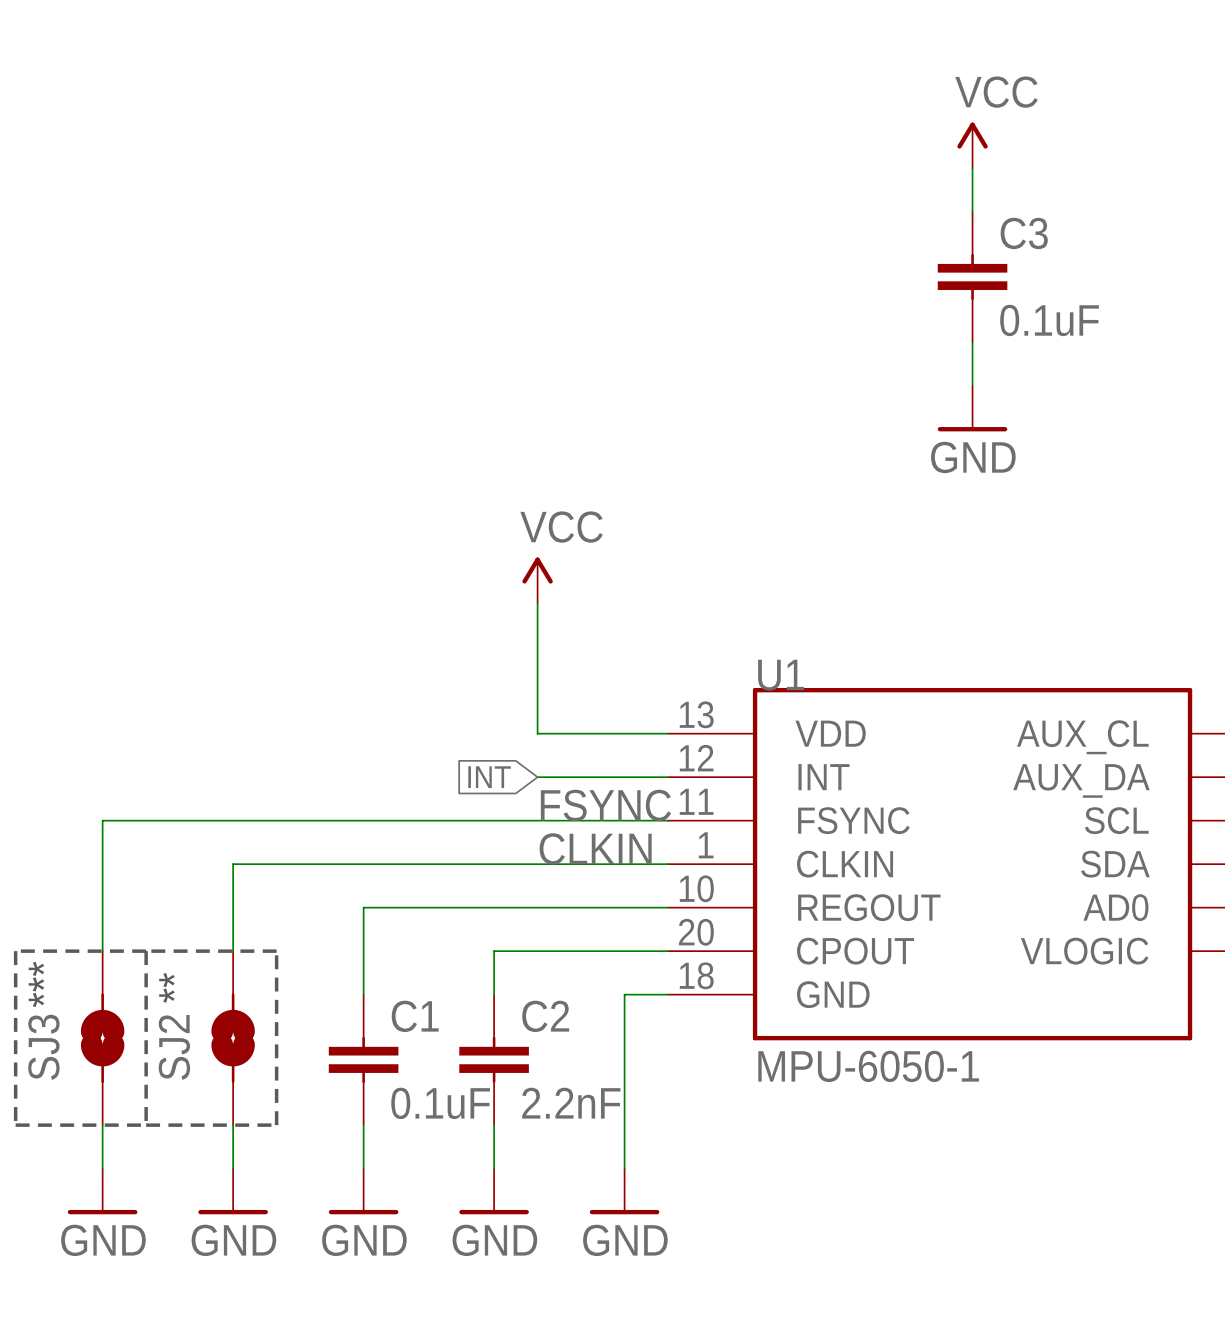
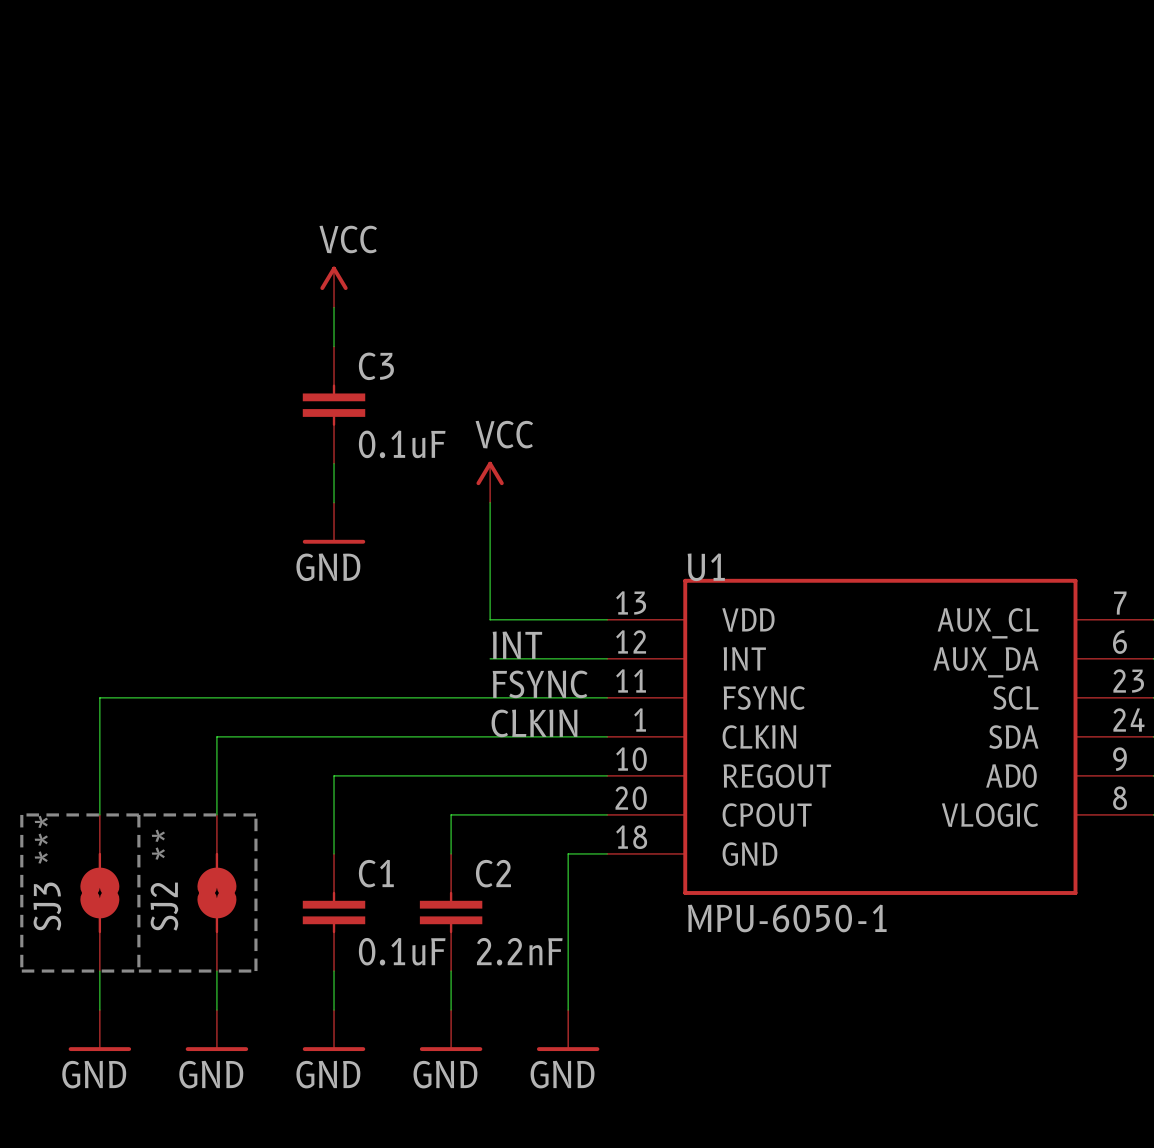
power symbol: VCC (972, 145) -> none
wire: (972, 168) (972, 211) -> none
C3 position: (972, 276) -> (334, 405)
wire: (972, 342) (972, 385) -> none
power symbol: none -> VCC (334, 287)
wire: none -> (334, 307) (334, 346)
power symbol: GND (972, 408) -> none
wire: none -> (334, 463) (334, 502)
power symbol: none -> GND (334, 523)
label: none -> INT (517, 645)
global label: INT (489, 777) -> none

